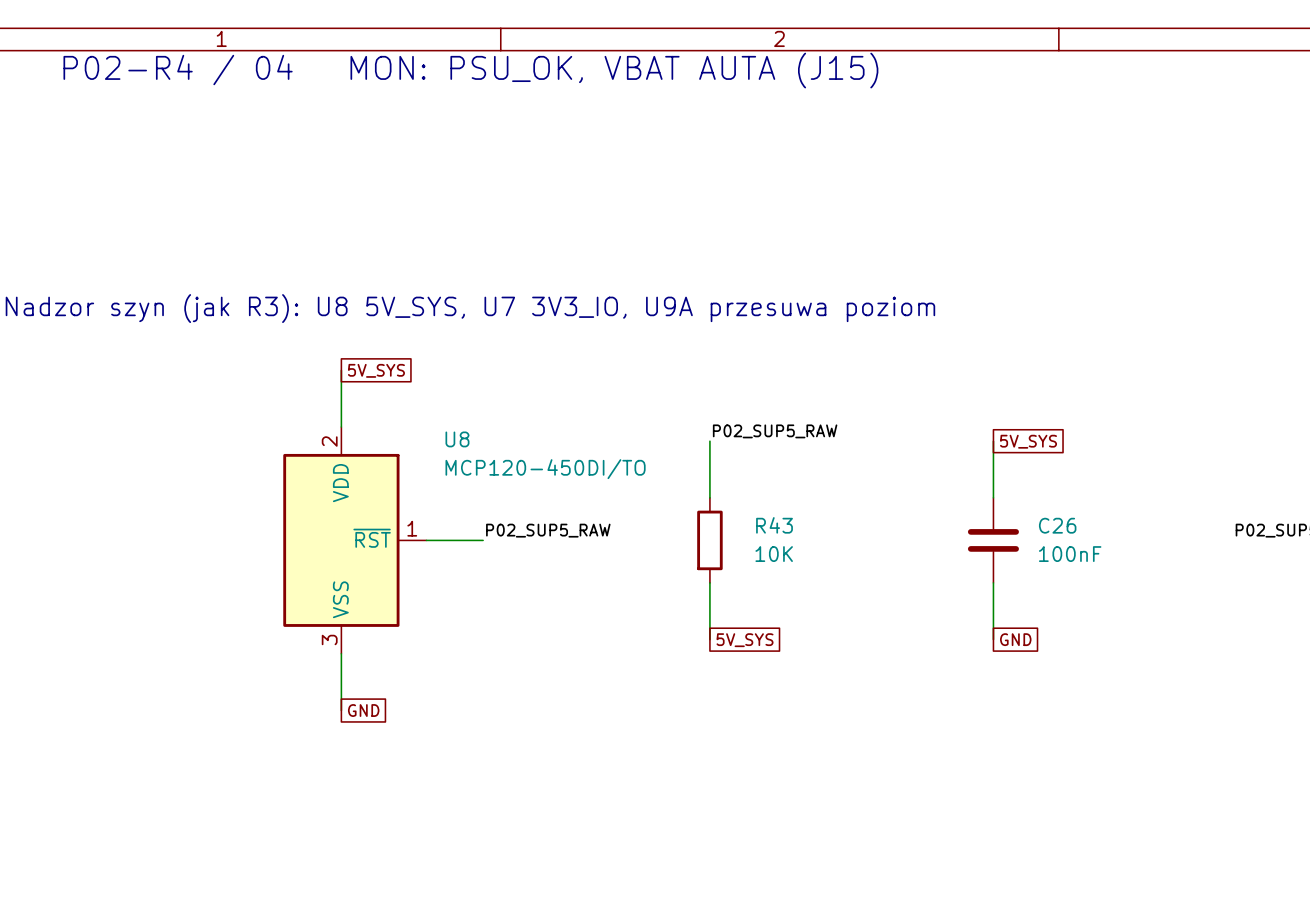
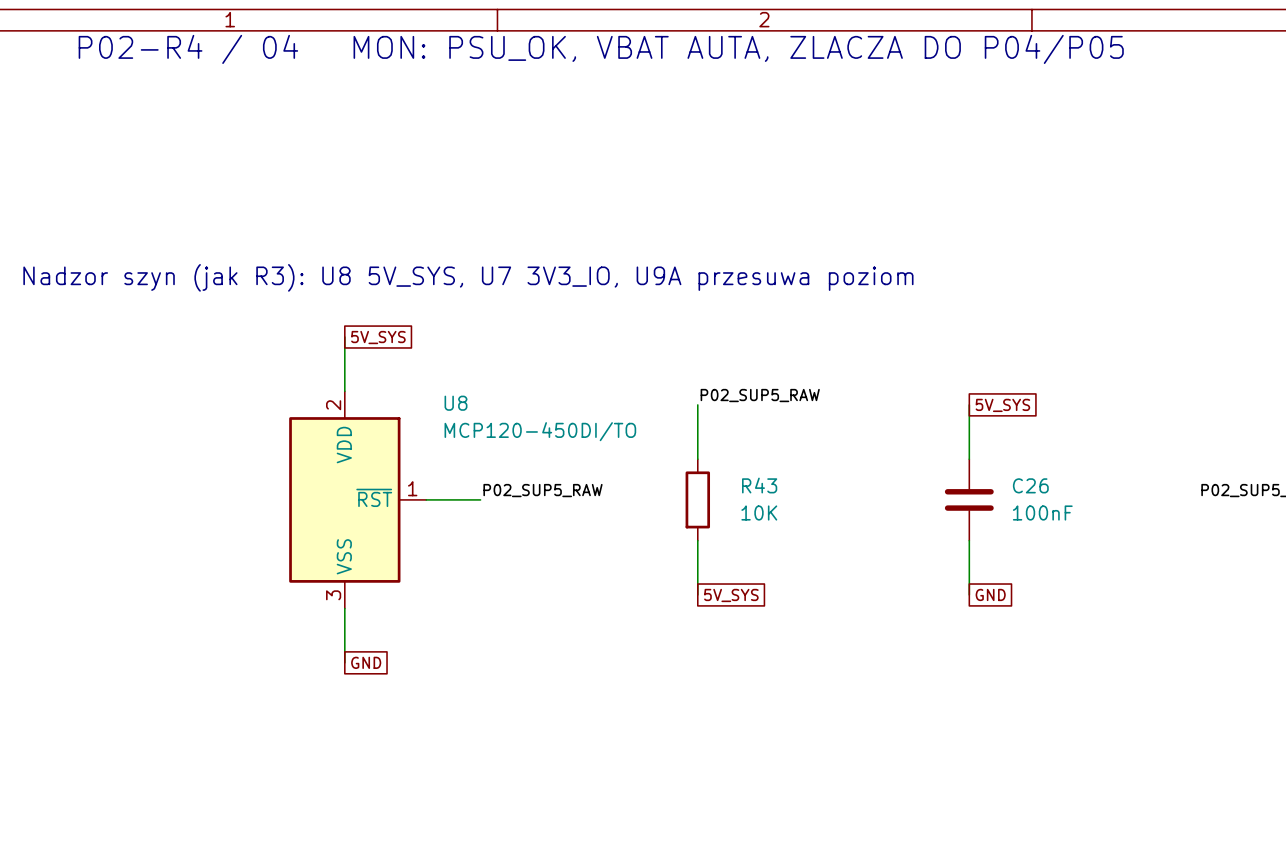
text: P02-R4 / 04 MON: PSU_OK, VBAT AUTA (J15) (470, 70) -> P02-R4 / 04 MON: PSU_OK, VBAT AUTA, ZLACZA DO P04/P05 (601, 49)

